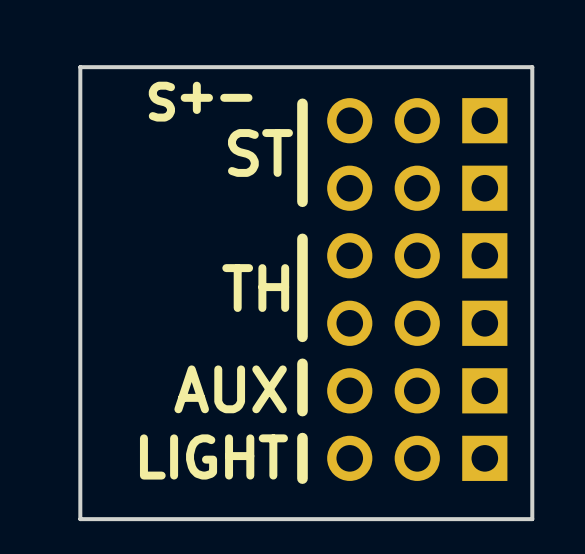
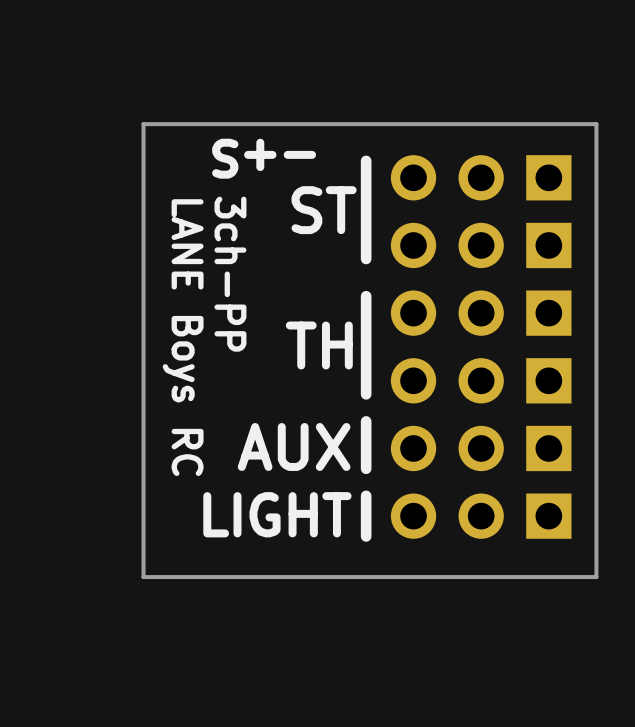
text: none -> 3ch-PP (230, 274)
text: none -> LANE Boys RC (183, 337)

